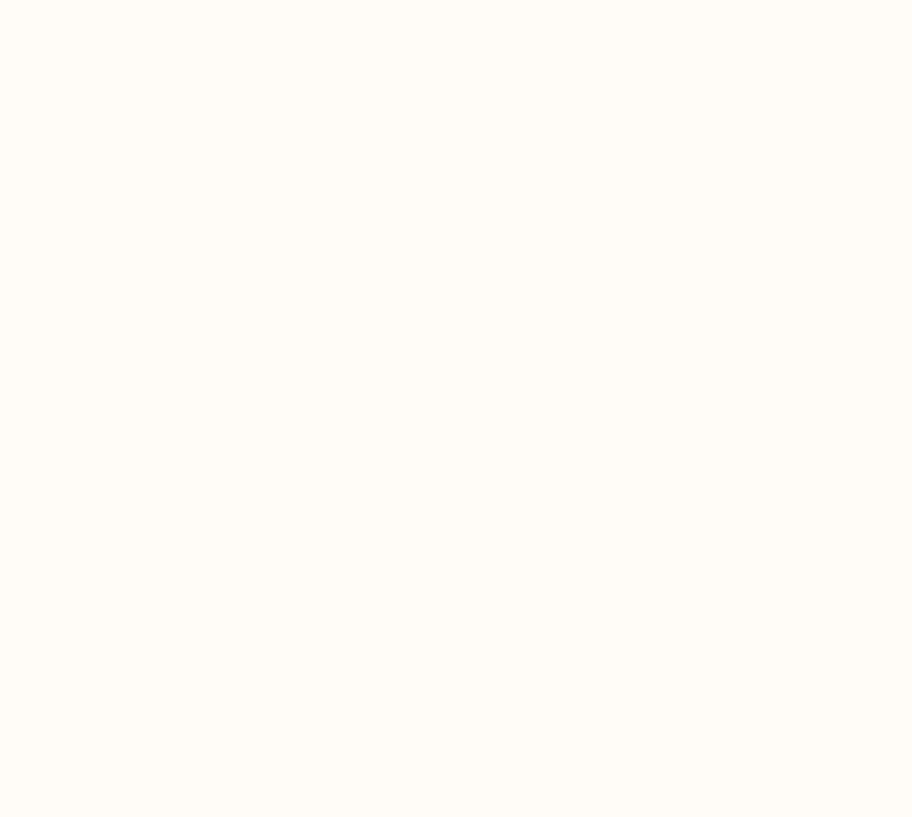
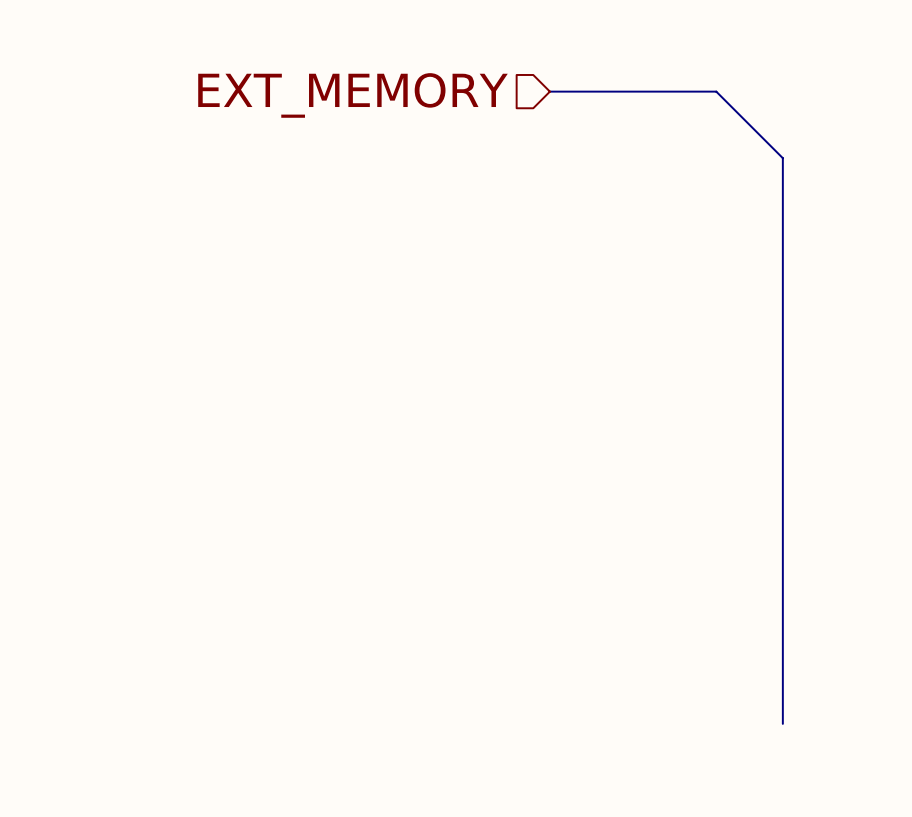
bus: none -> (549, 91) (716, 91) (782, 158) (782, 723)
hierarchical label: none -> EXT_MEMORY (352, 95)

